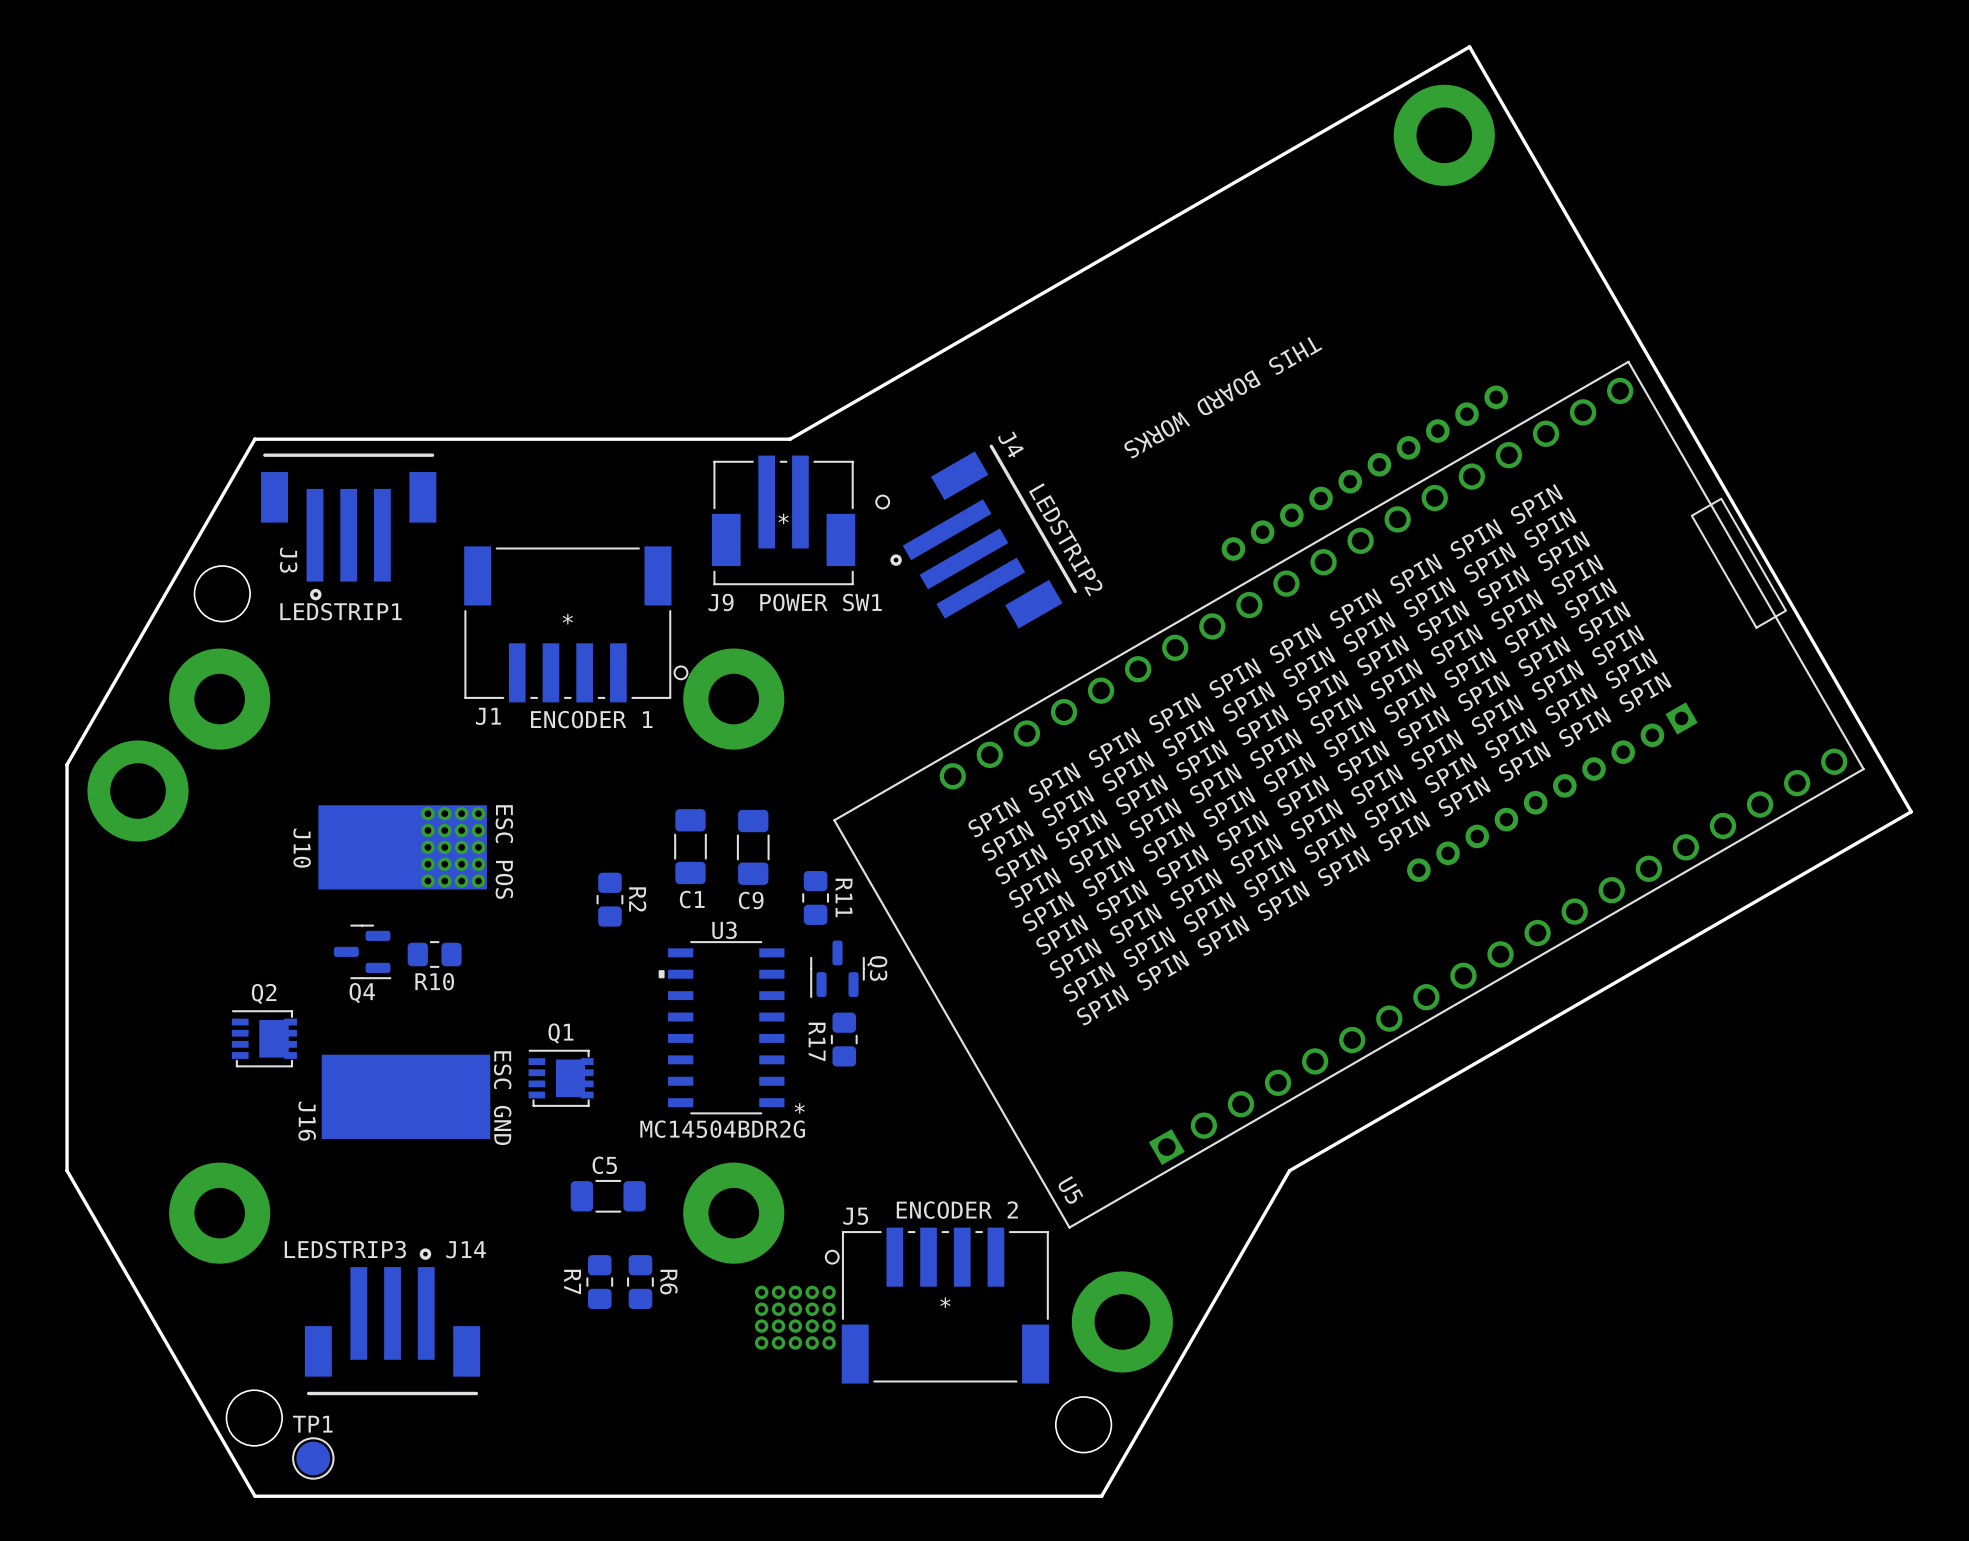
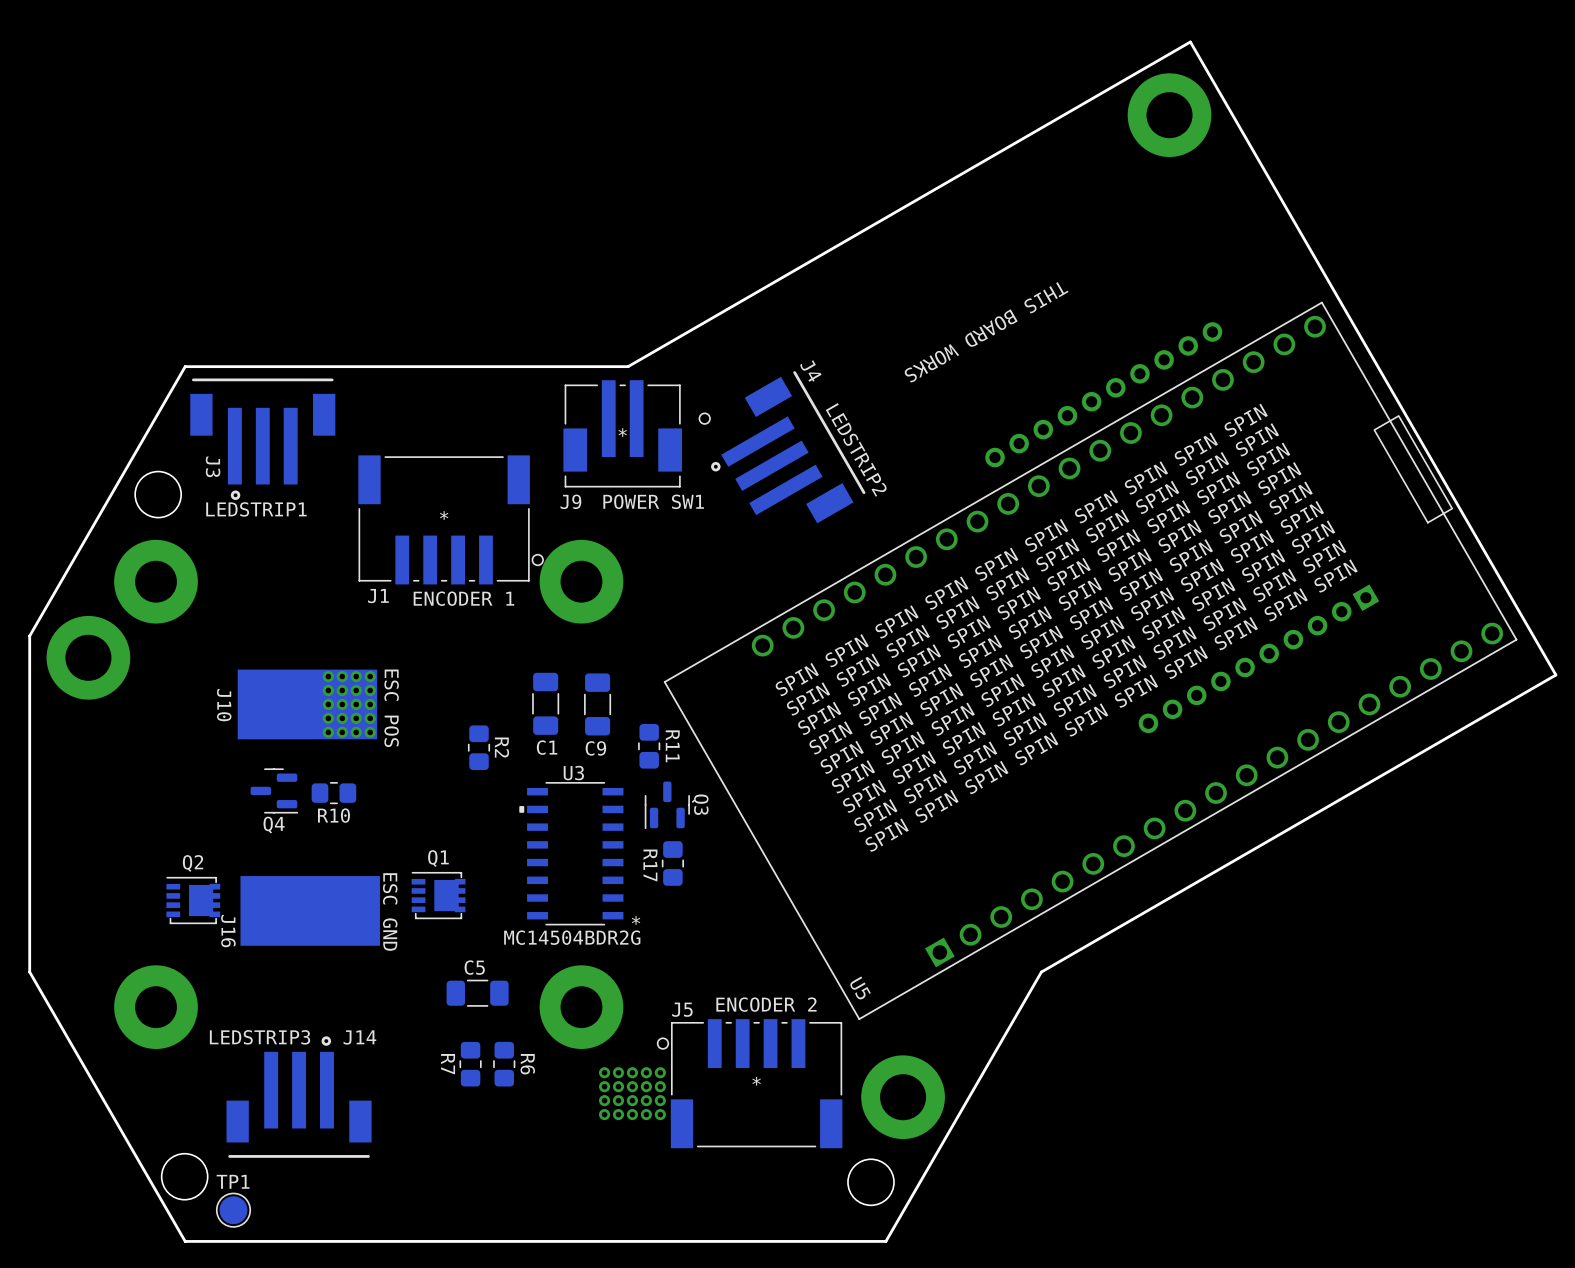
Q2 position: (264, 1038) -> (193, 900)

